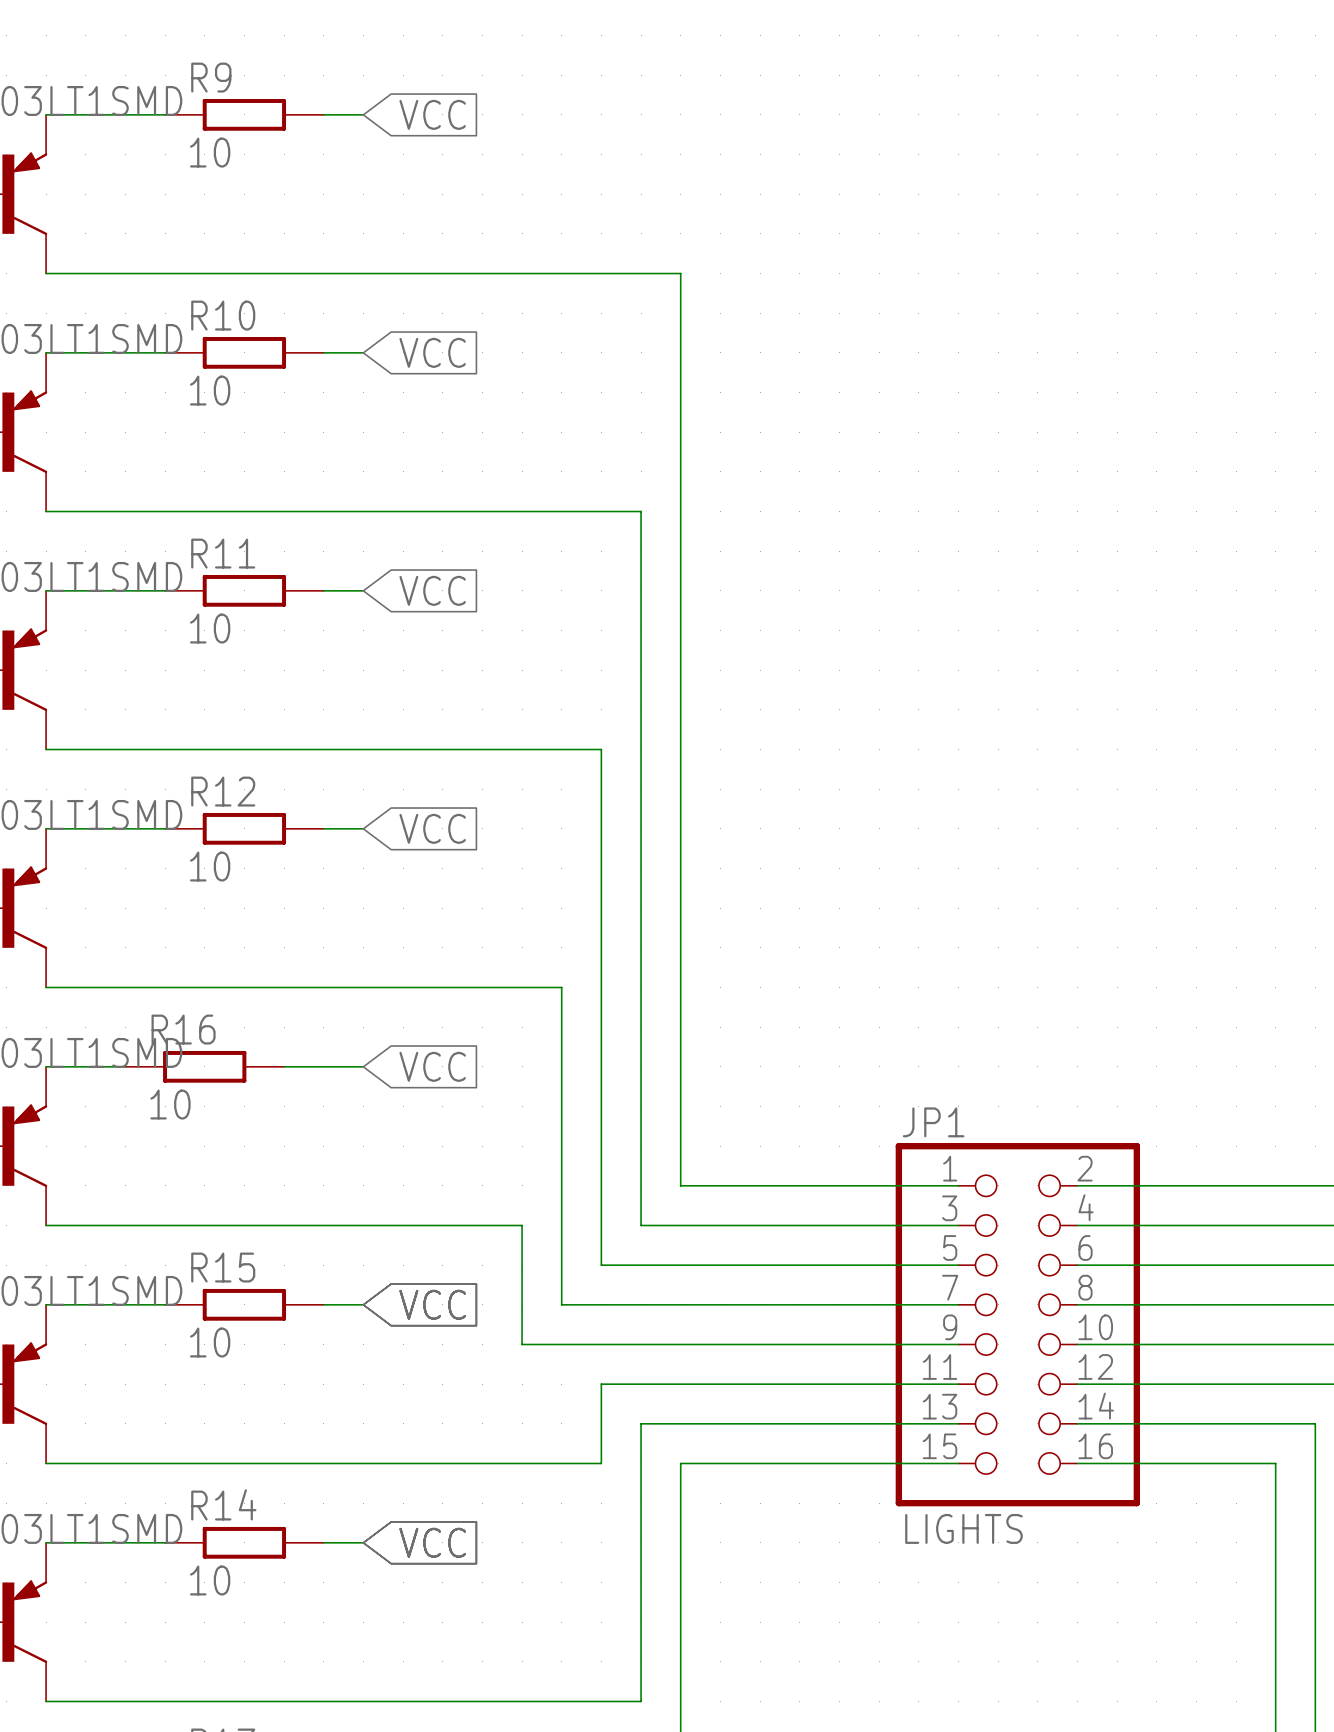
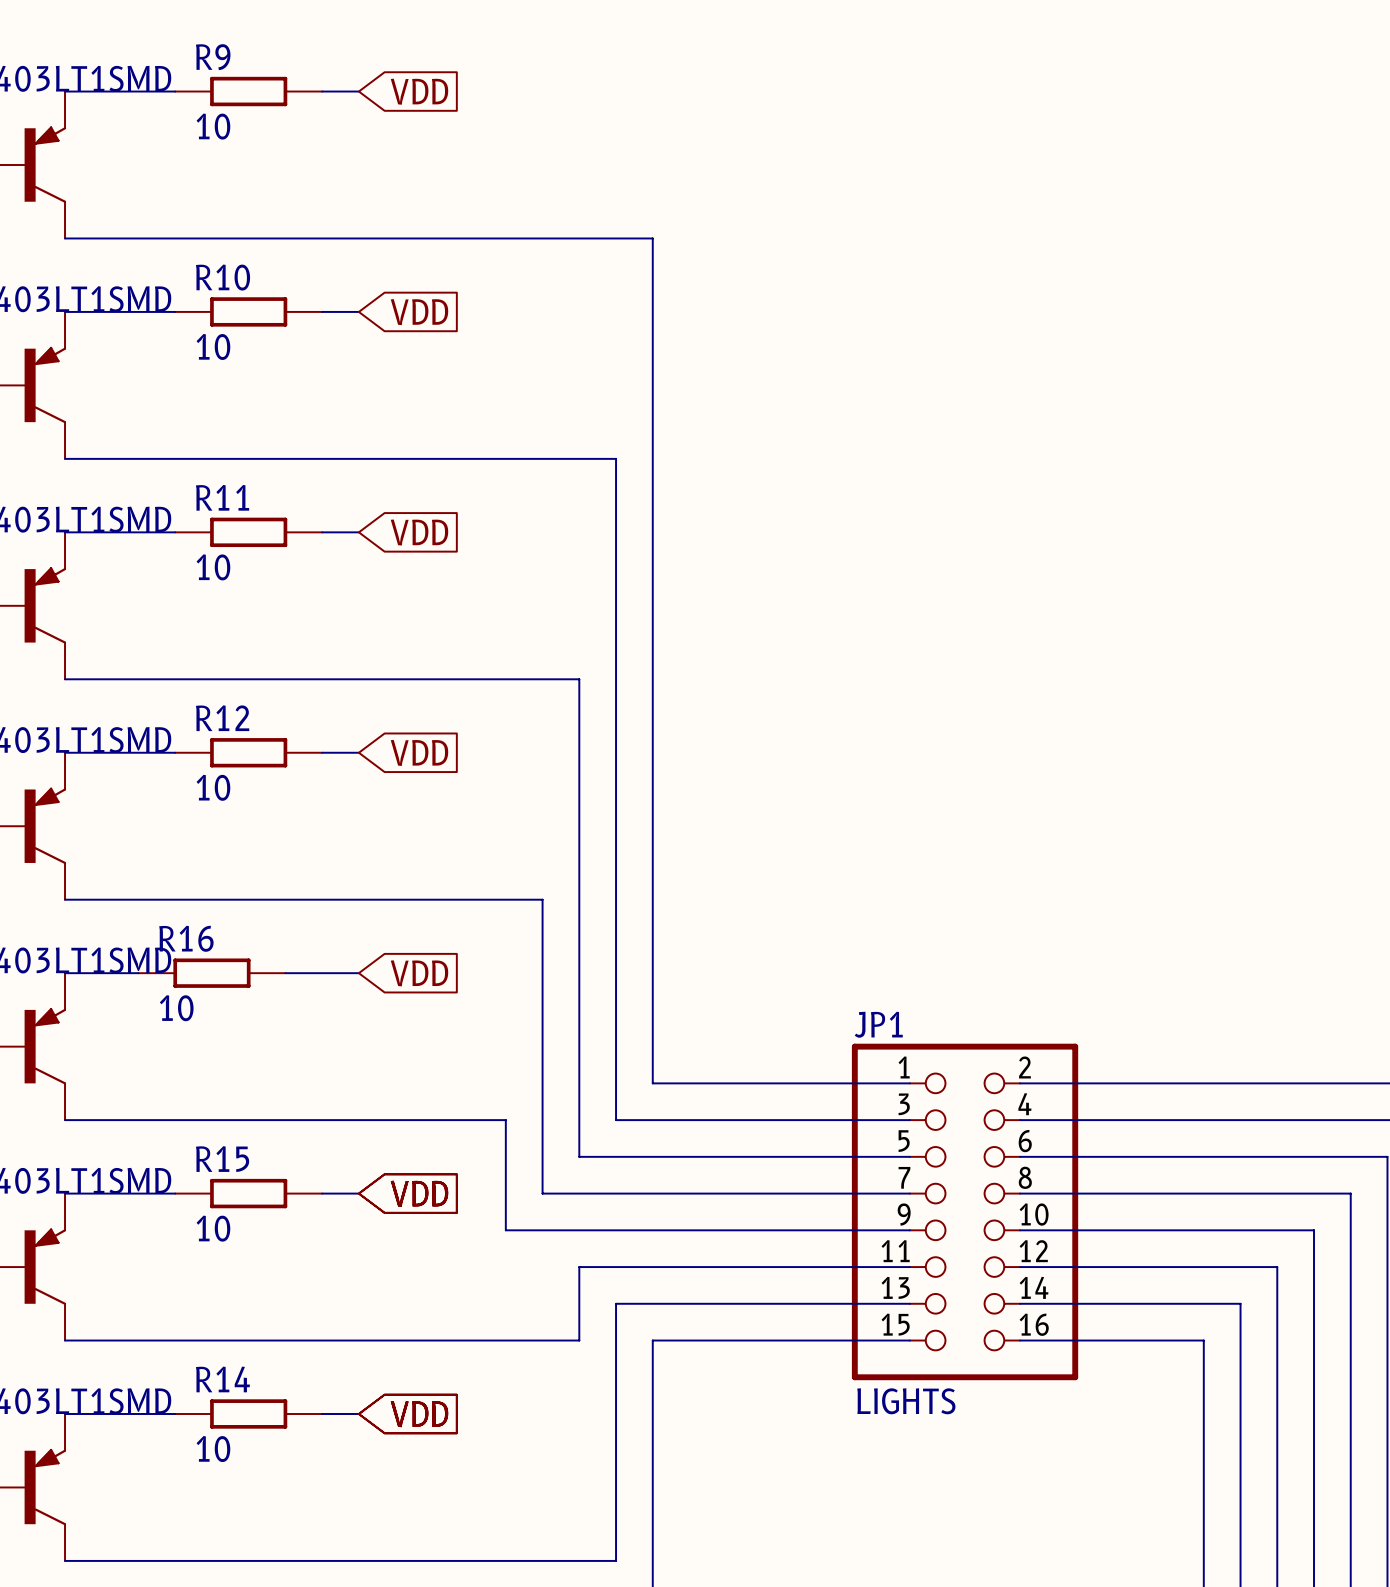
global label: VCC (432, 114) -> VDD (419, 91)
global label: VCC (432, 352) -> VDD (419, 312)
global label: VCC (432, 590) -> VDD (419, 532)
global label: VCC (432, 828) -> VDD (419, 752)
global label: VCC (432, 1066) -> VDD (419, 973)
global label: VCC (432, 1304) -> VDD (419, 1193)
global label: VCC (432, 1542) -> VDD (419, 1414)

